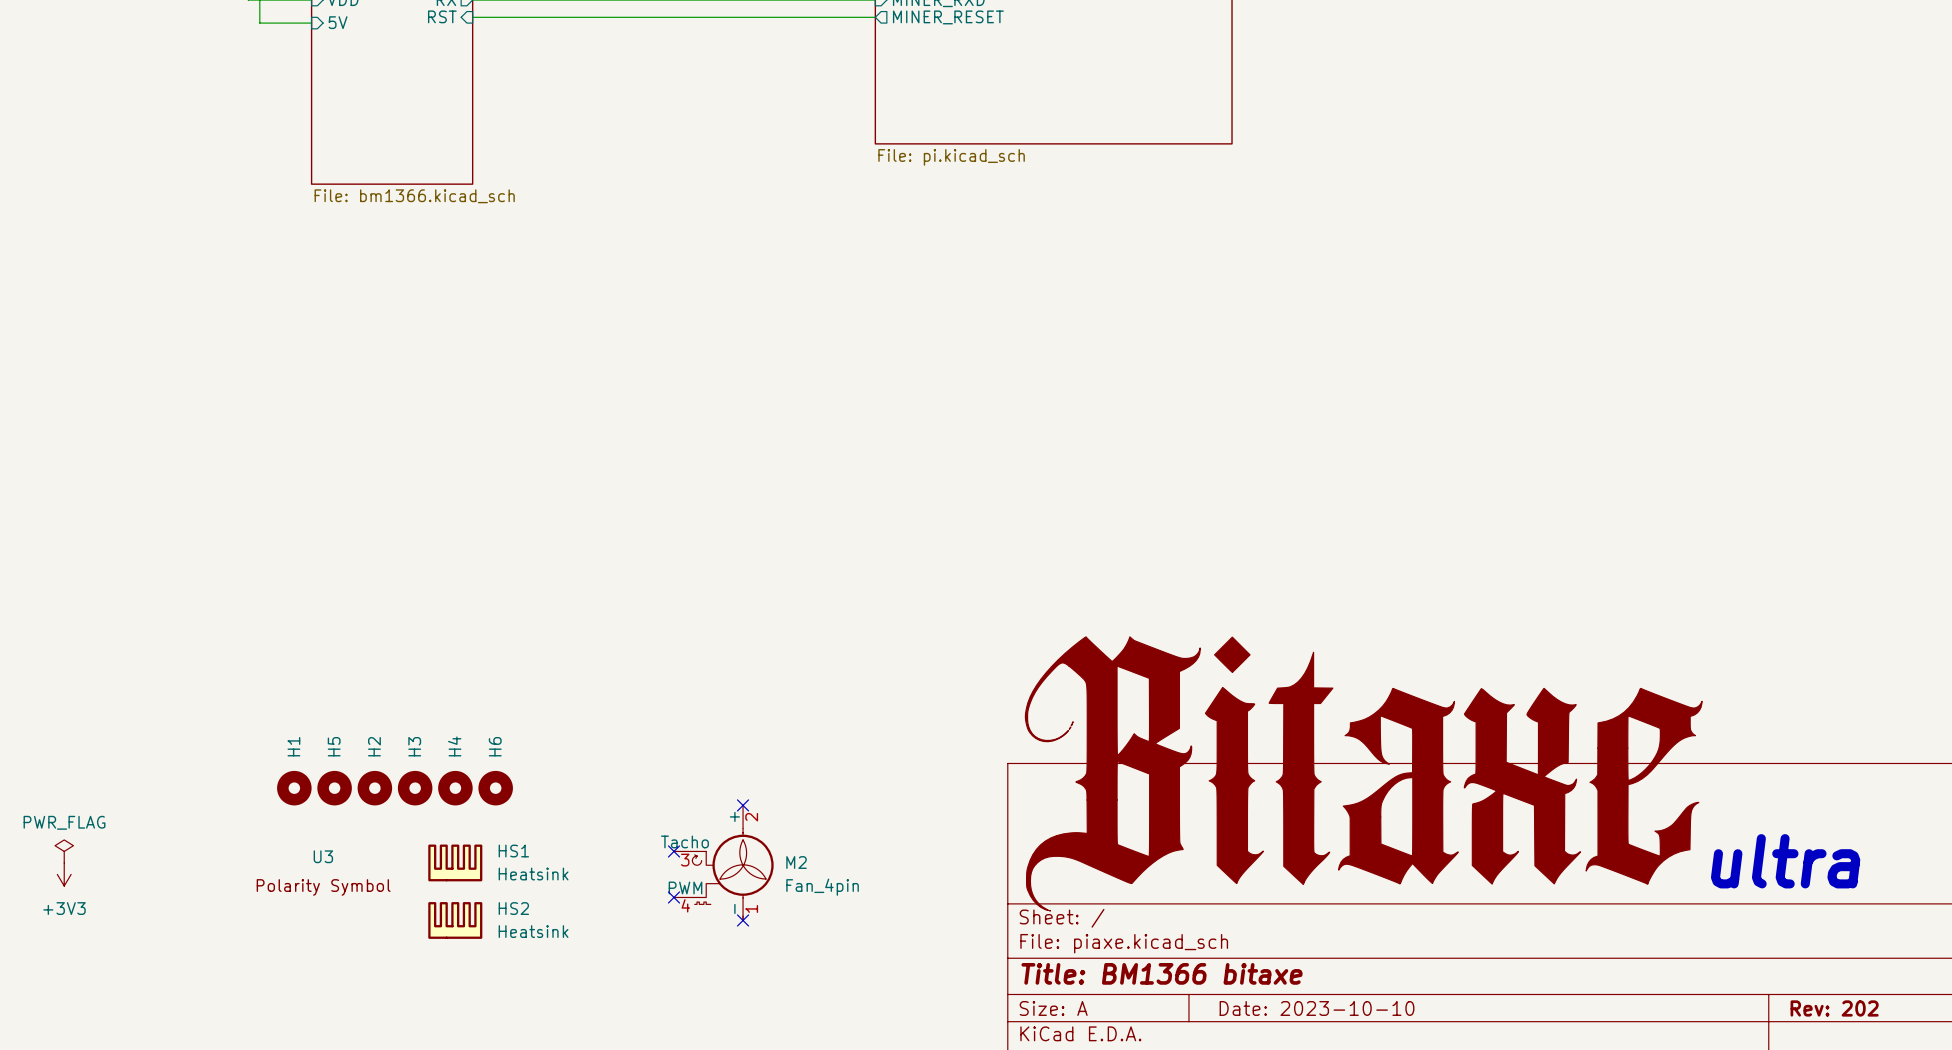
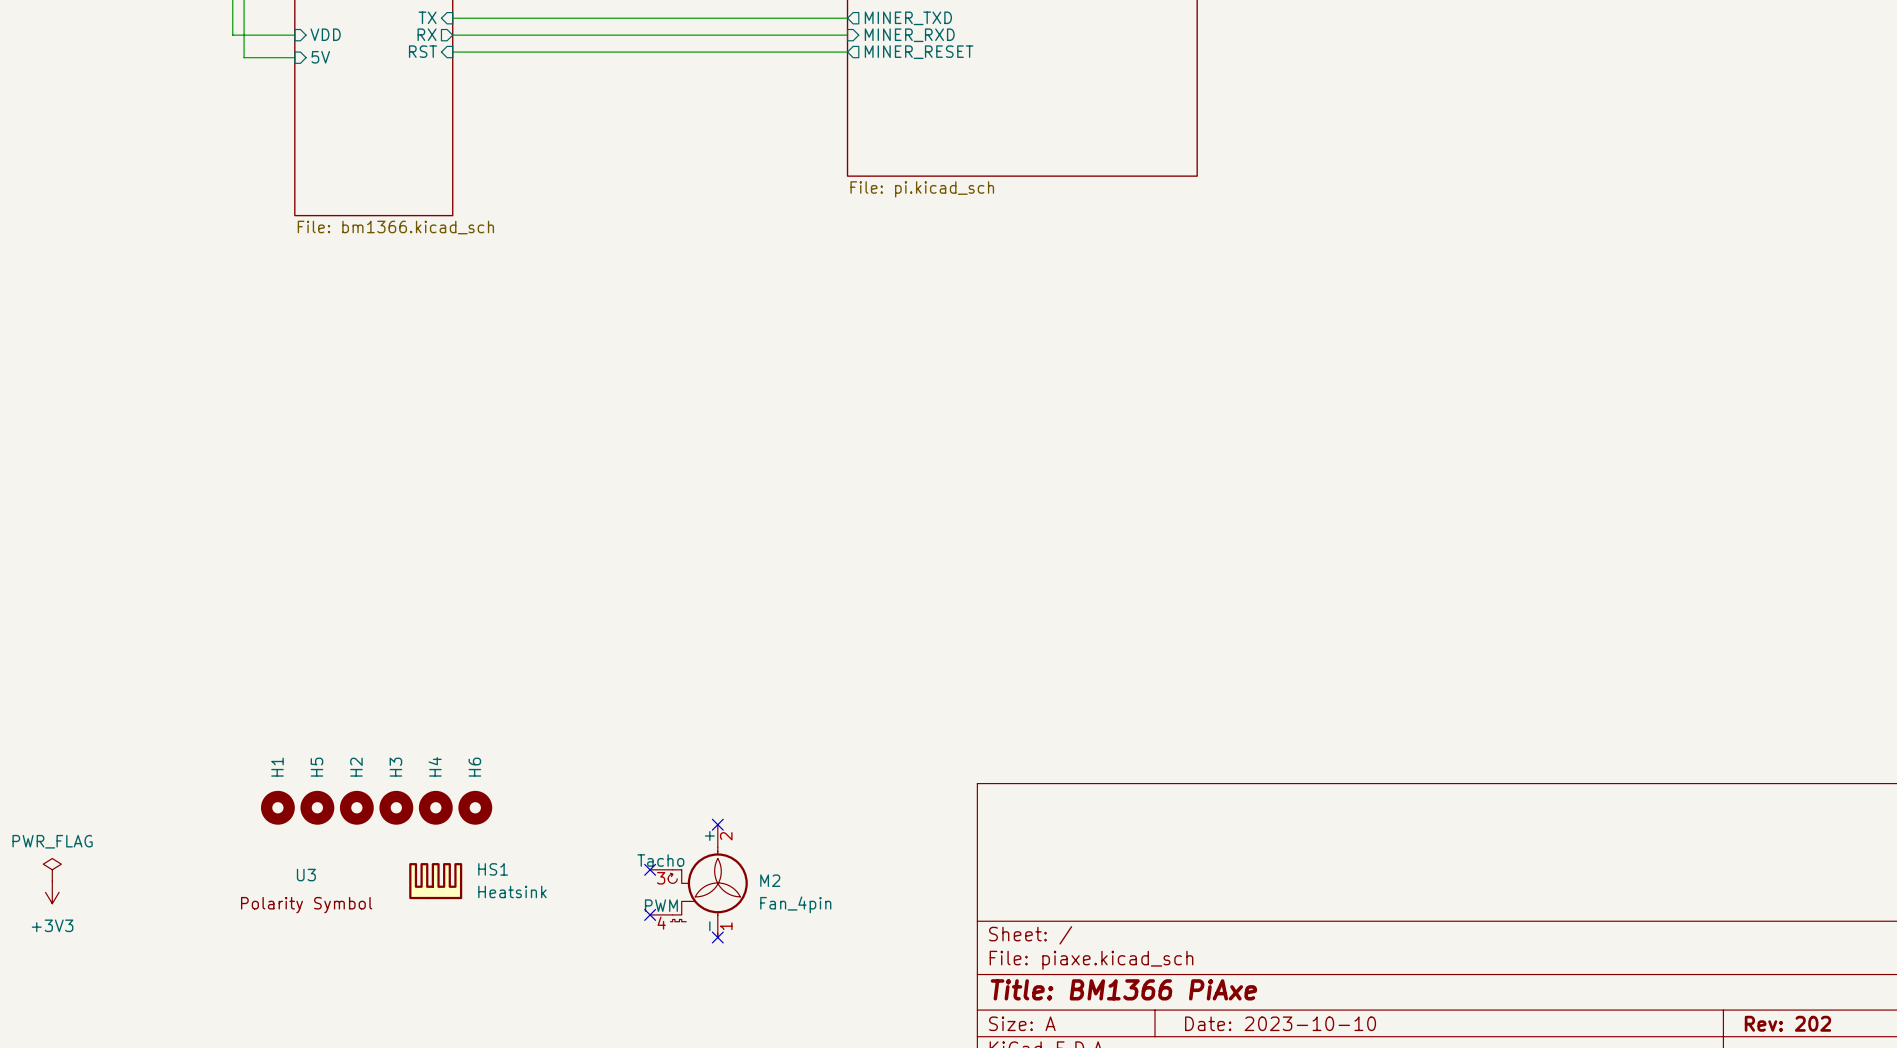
power symbol: (1363, 773) -> none
text: ultra (1785, 861) -> none
HS2: Heatsink (455, 920) -> none
title block: Title: BM1366 bitaxe (1162, 973) -> Title: BM1366 PiAxe (1123, 989)

